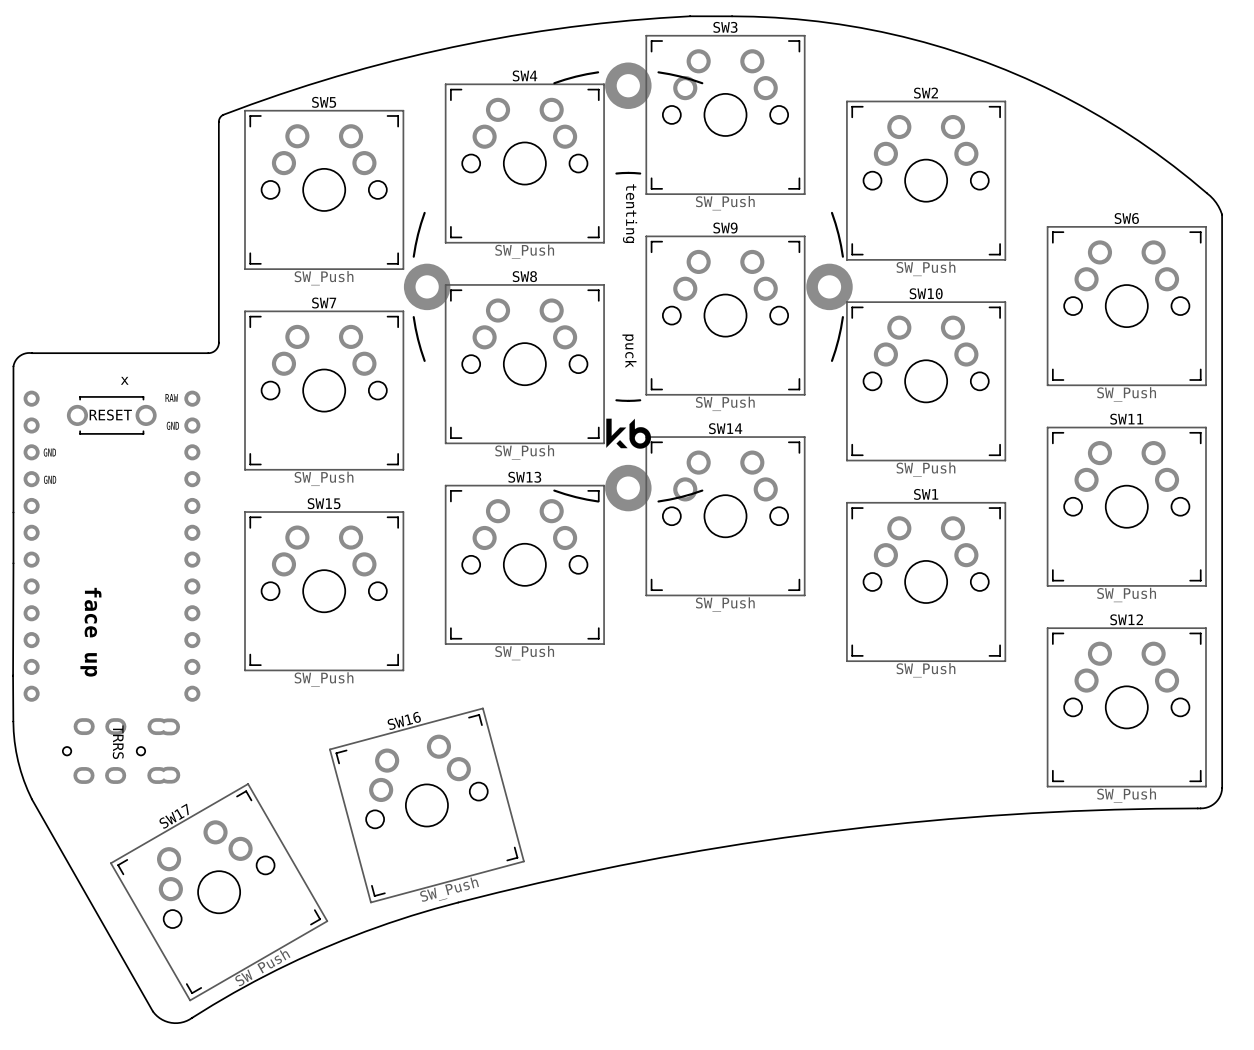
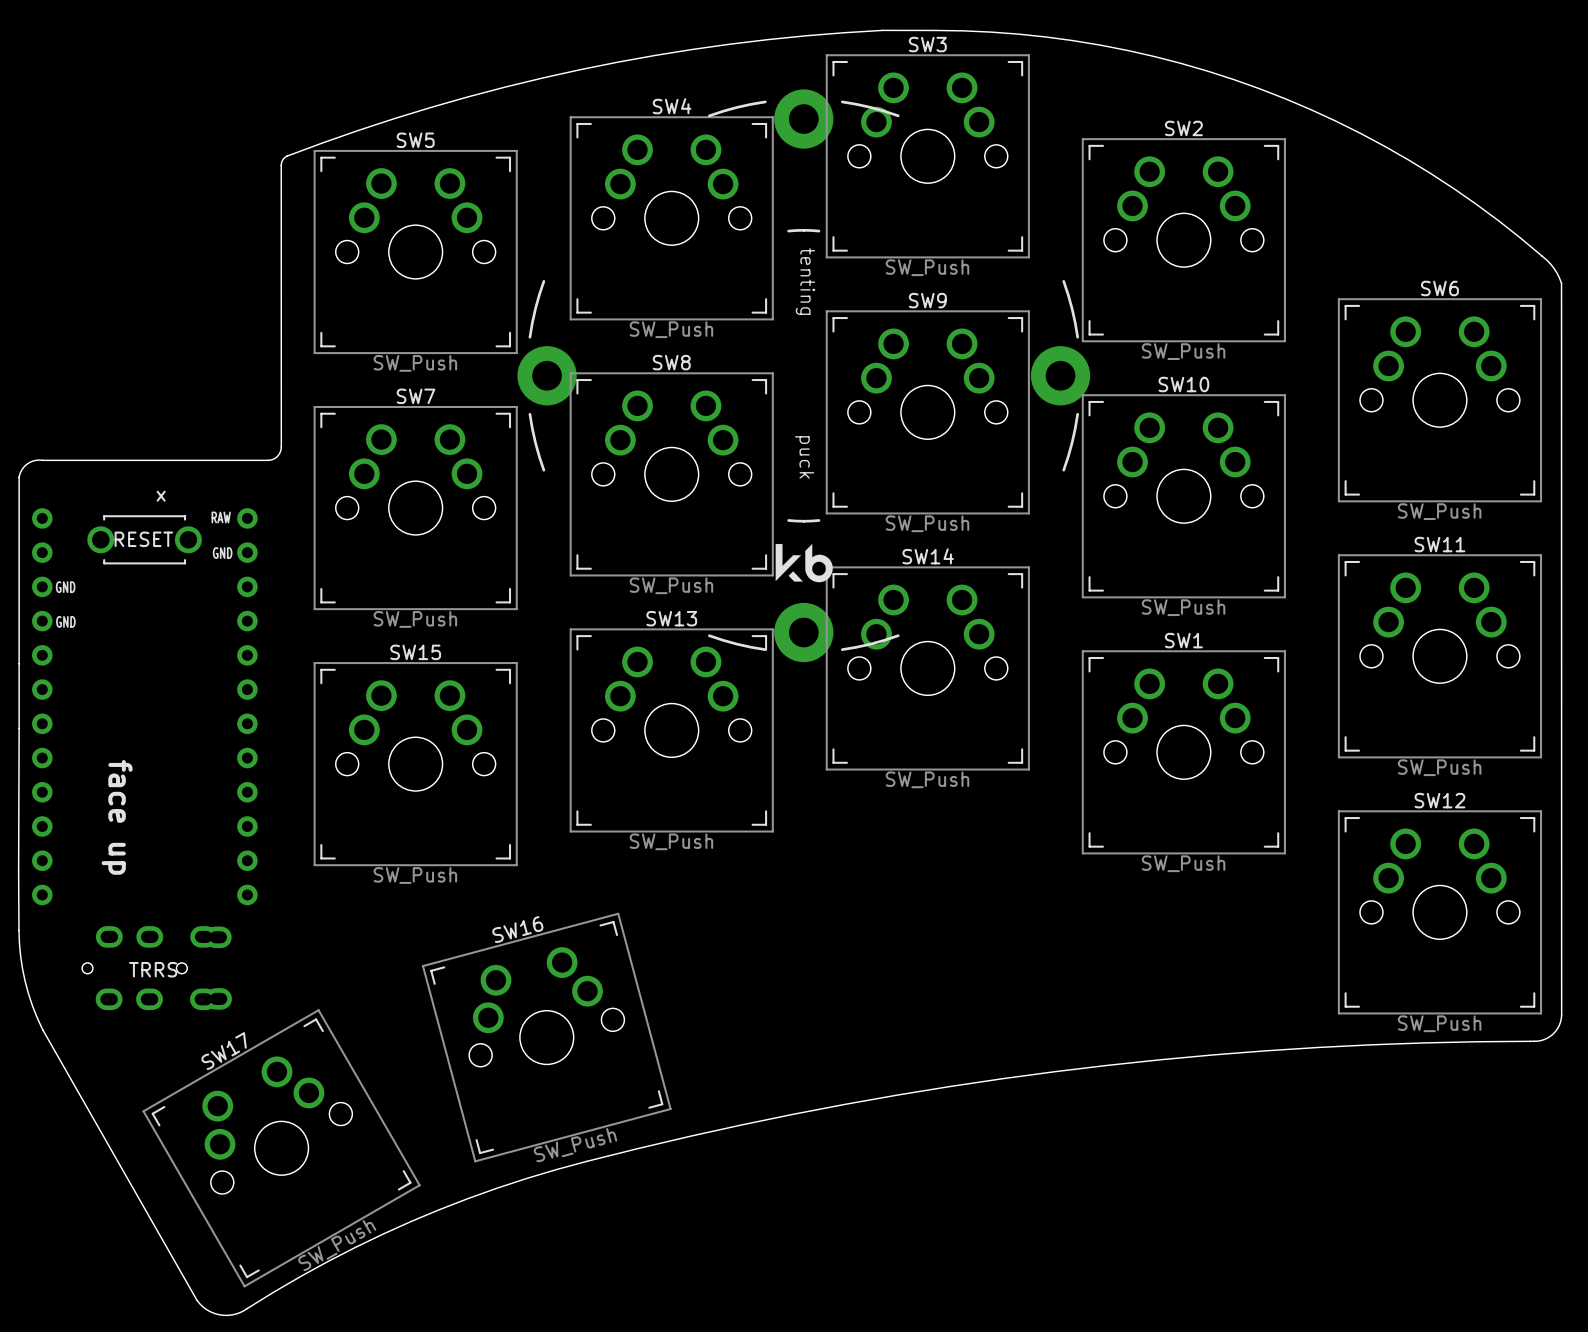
part text rotation: 0° (118, 742) -> 90° counterclockwise (153, 969)

